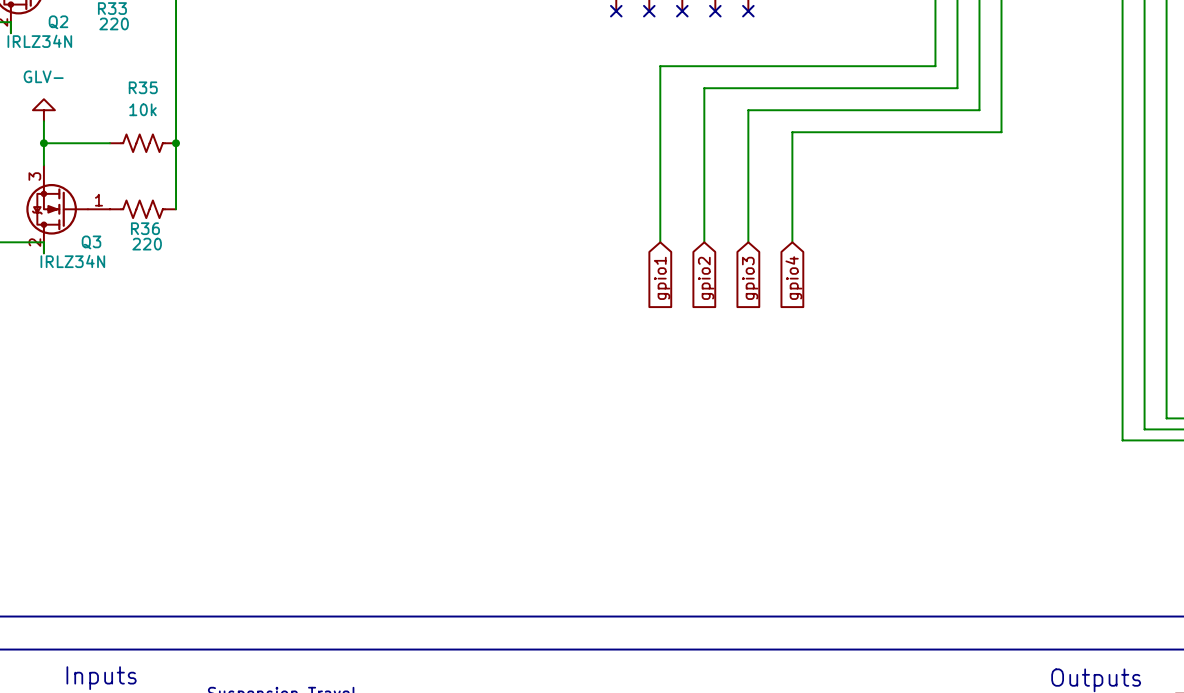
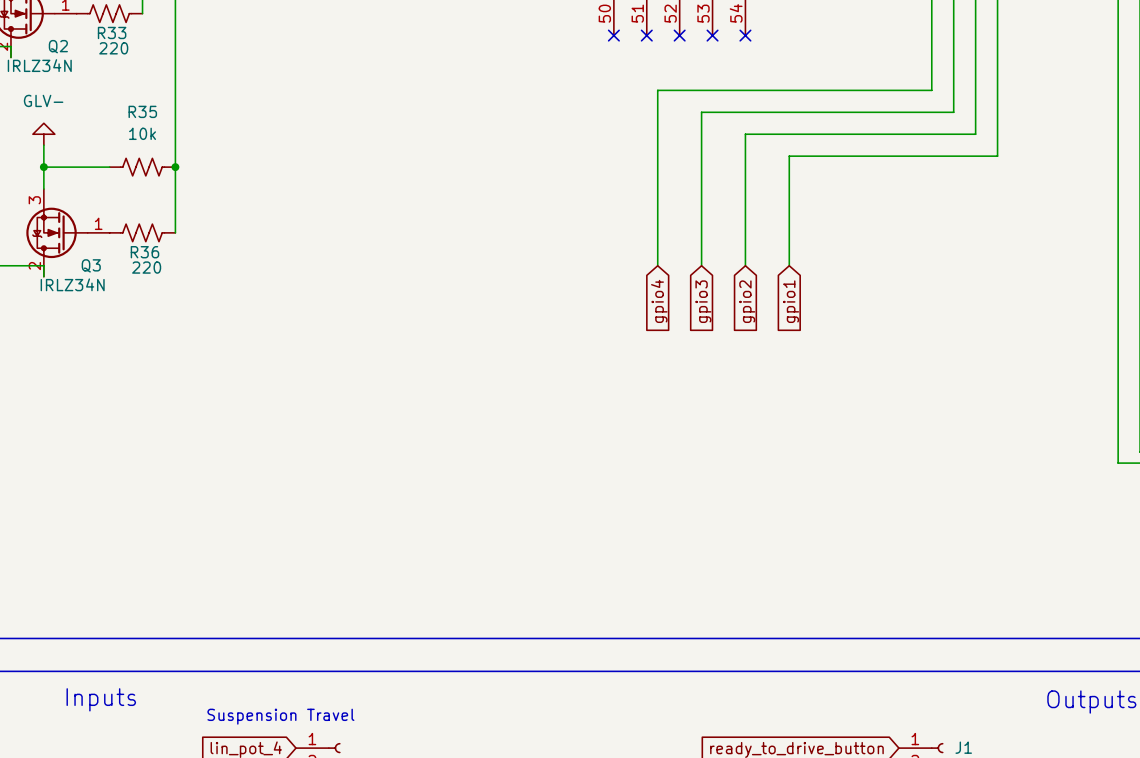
global label: gpio1 (662, 278) -> gpio4 (659, 301)
global label: gpio2 (706, 278) -> gpio3 (703, 301)
global label: gpio3 (750, 278) -> gpio2 (747, 301)
global label: gpio4 (793, 278) -> gpio1 (791, 301)

